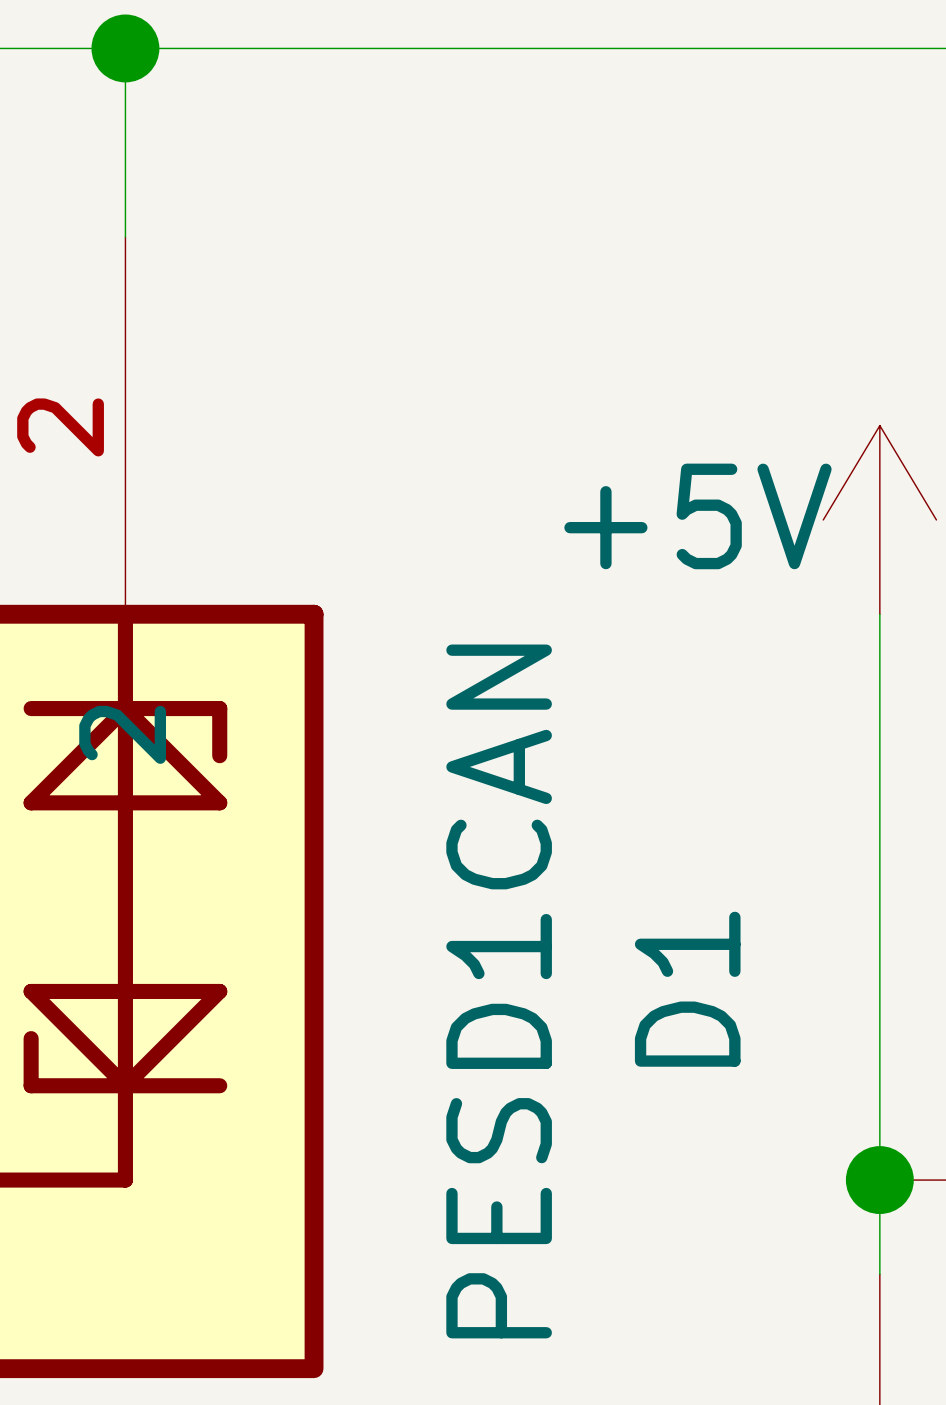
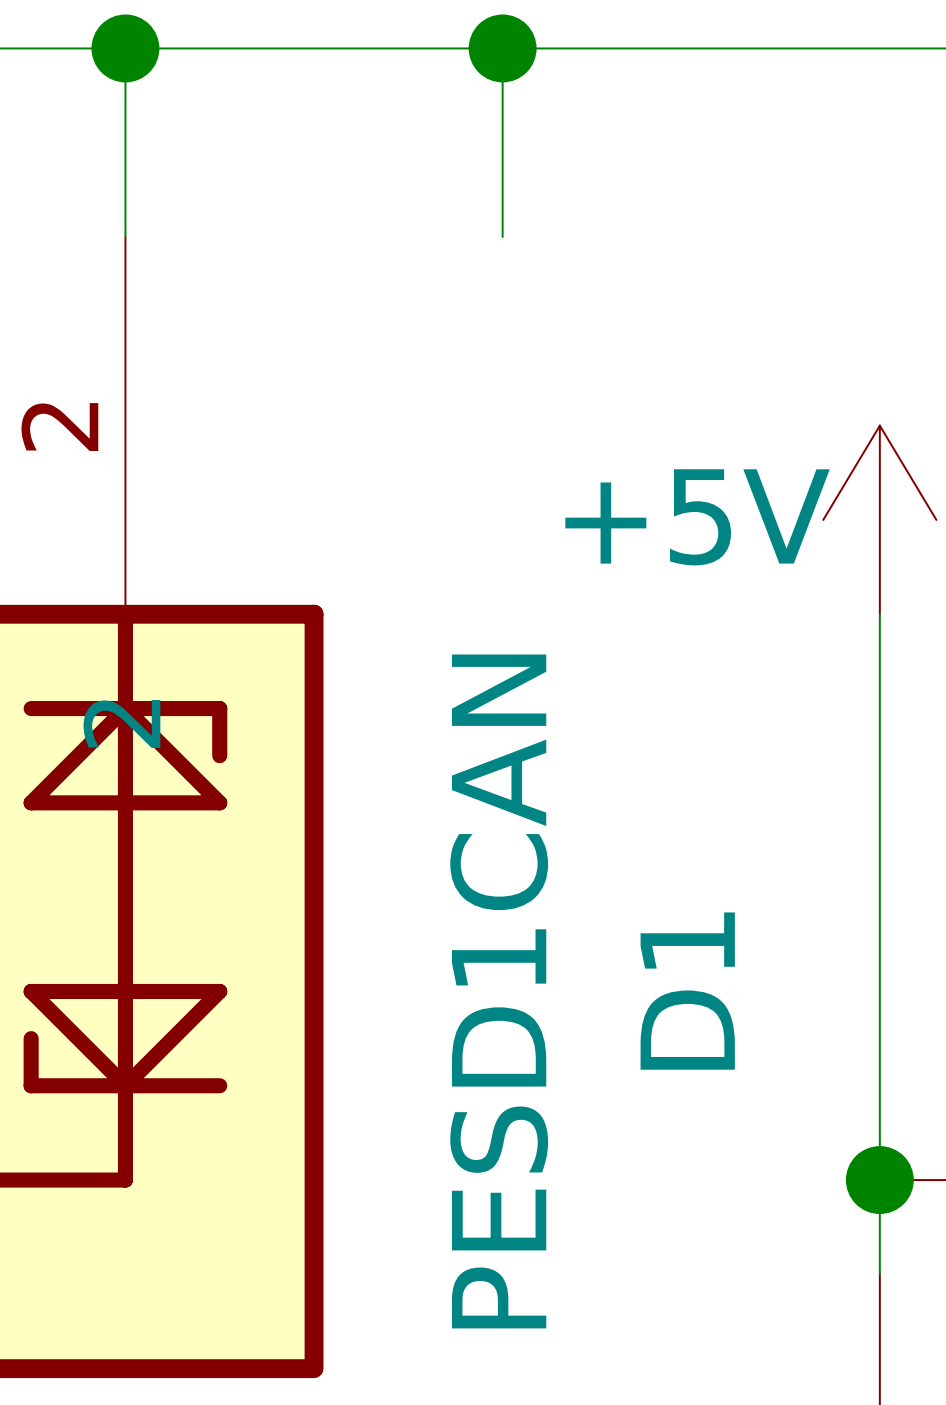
wire: none -> (502, 48) (502, 237)
junction: none -> (502, 48)

